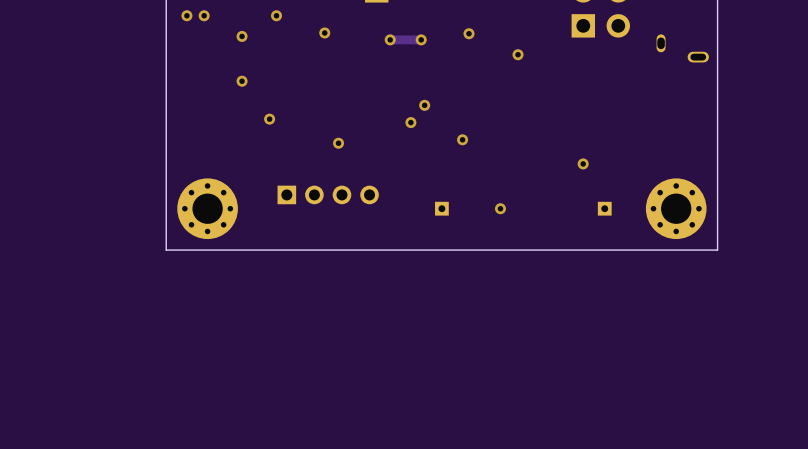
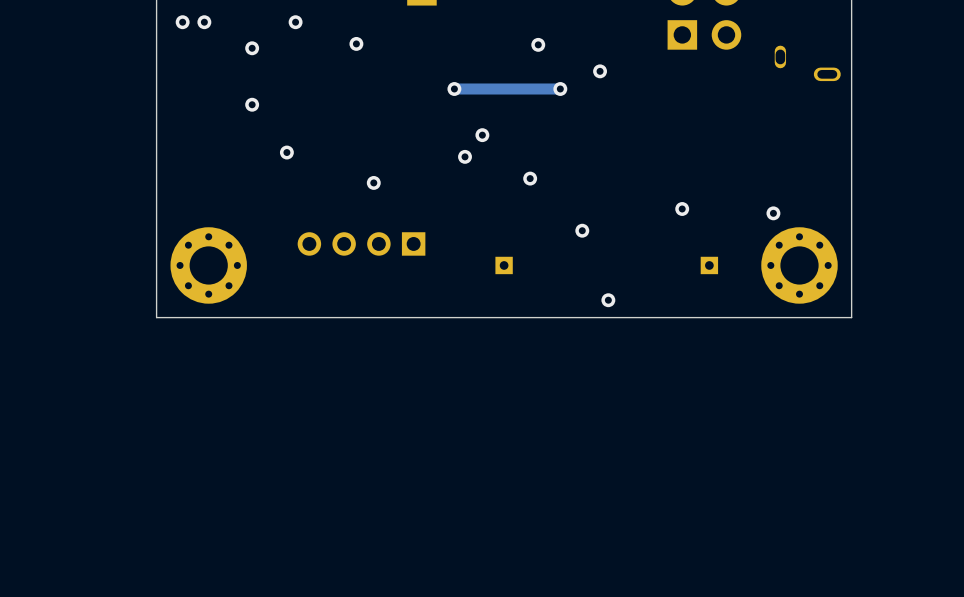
via: (390, 39) -> none
track: (421, 39) (390, 39) -> none
via: (421, 39) -> none
via: none -> (454, 89)
track: none -> (560, 89) (454, 89)
via: none -> (560, 89)
via: none -> (773, 213)
via: none -> (582, 230)
part rotation: 0° (328, 194) -> 180° (361, 243)
via: (500, 208) -> none
via: none -> (608, 300)

